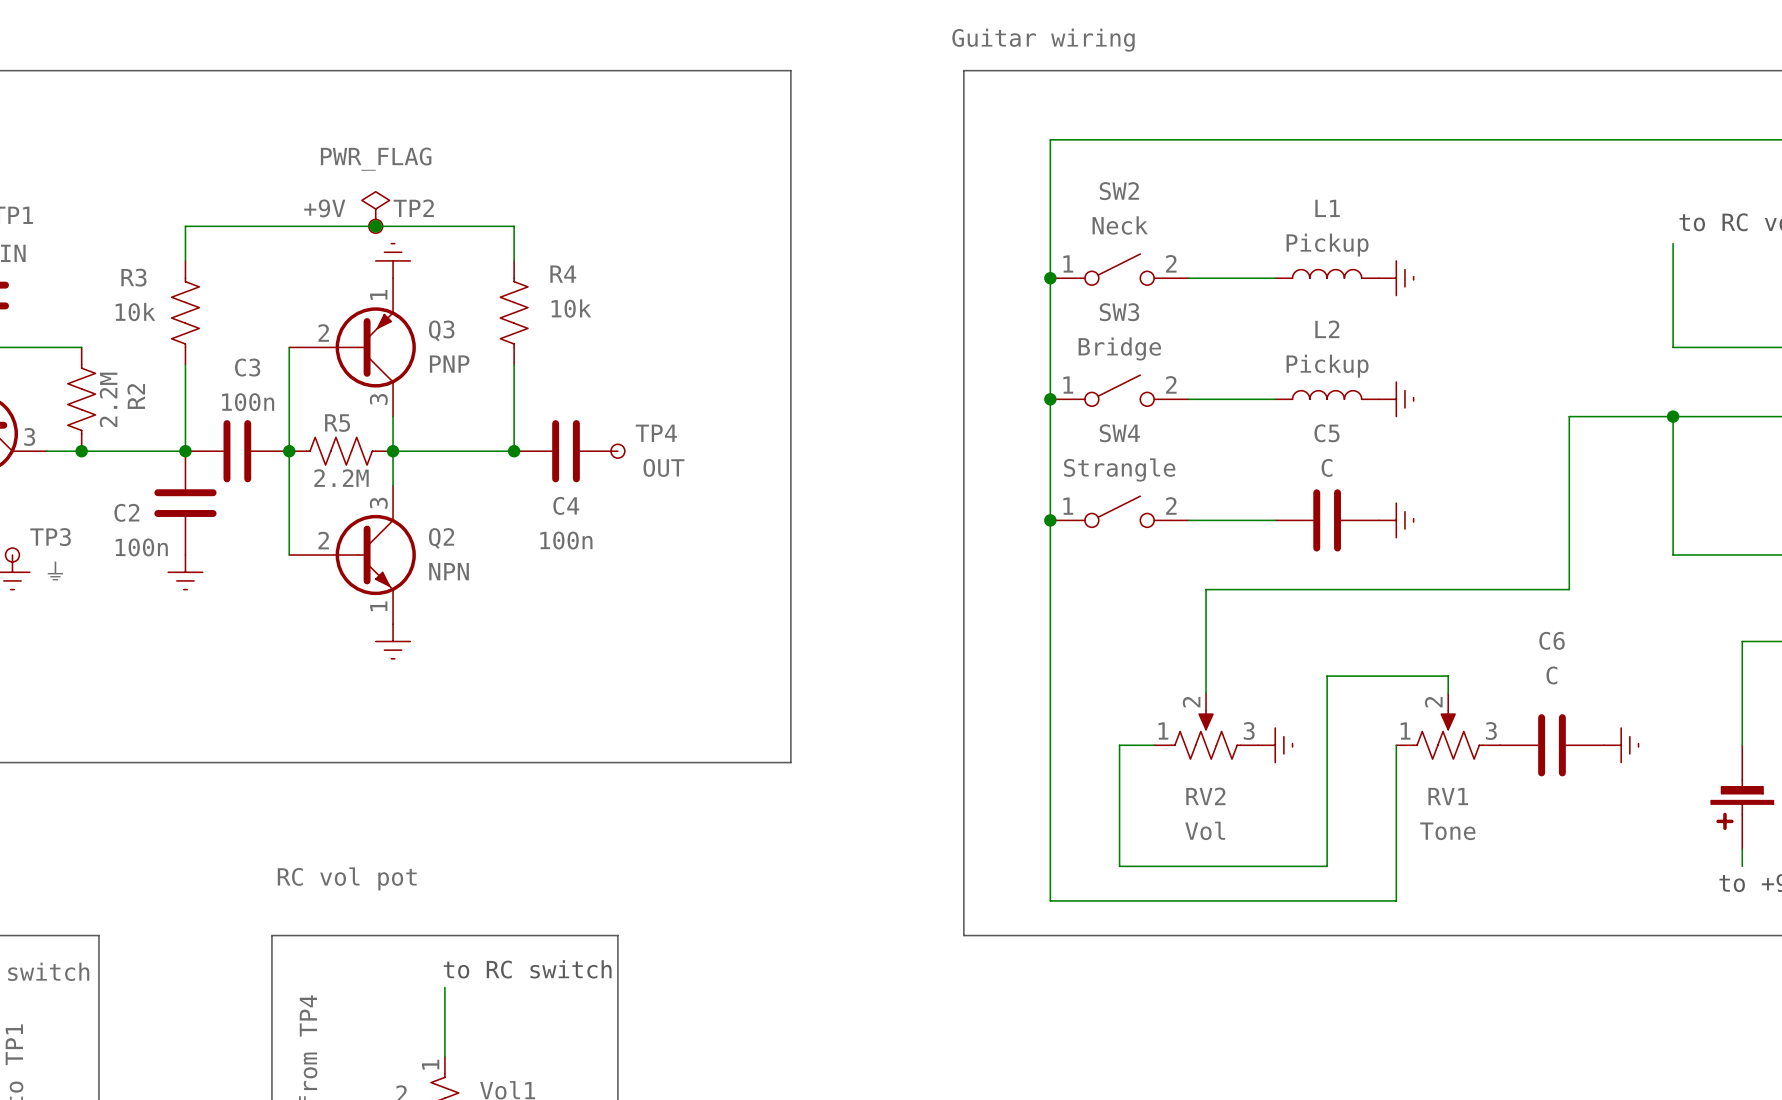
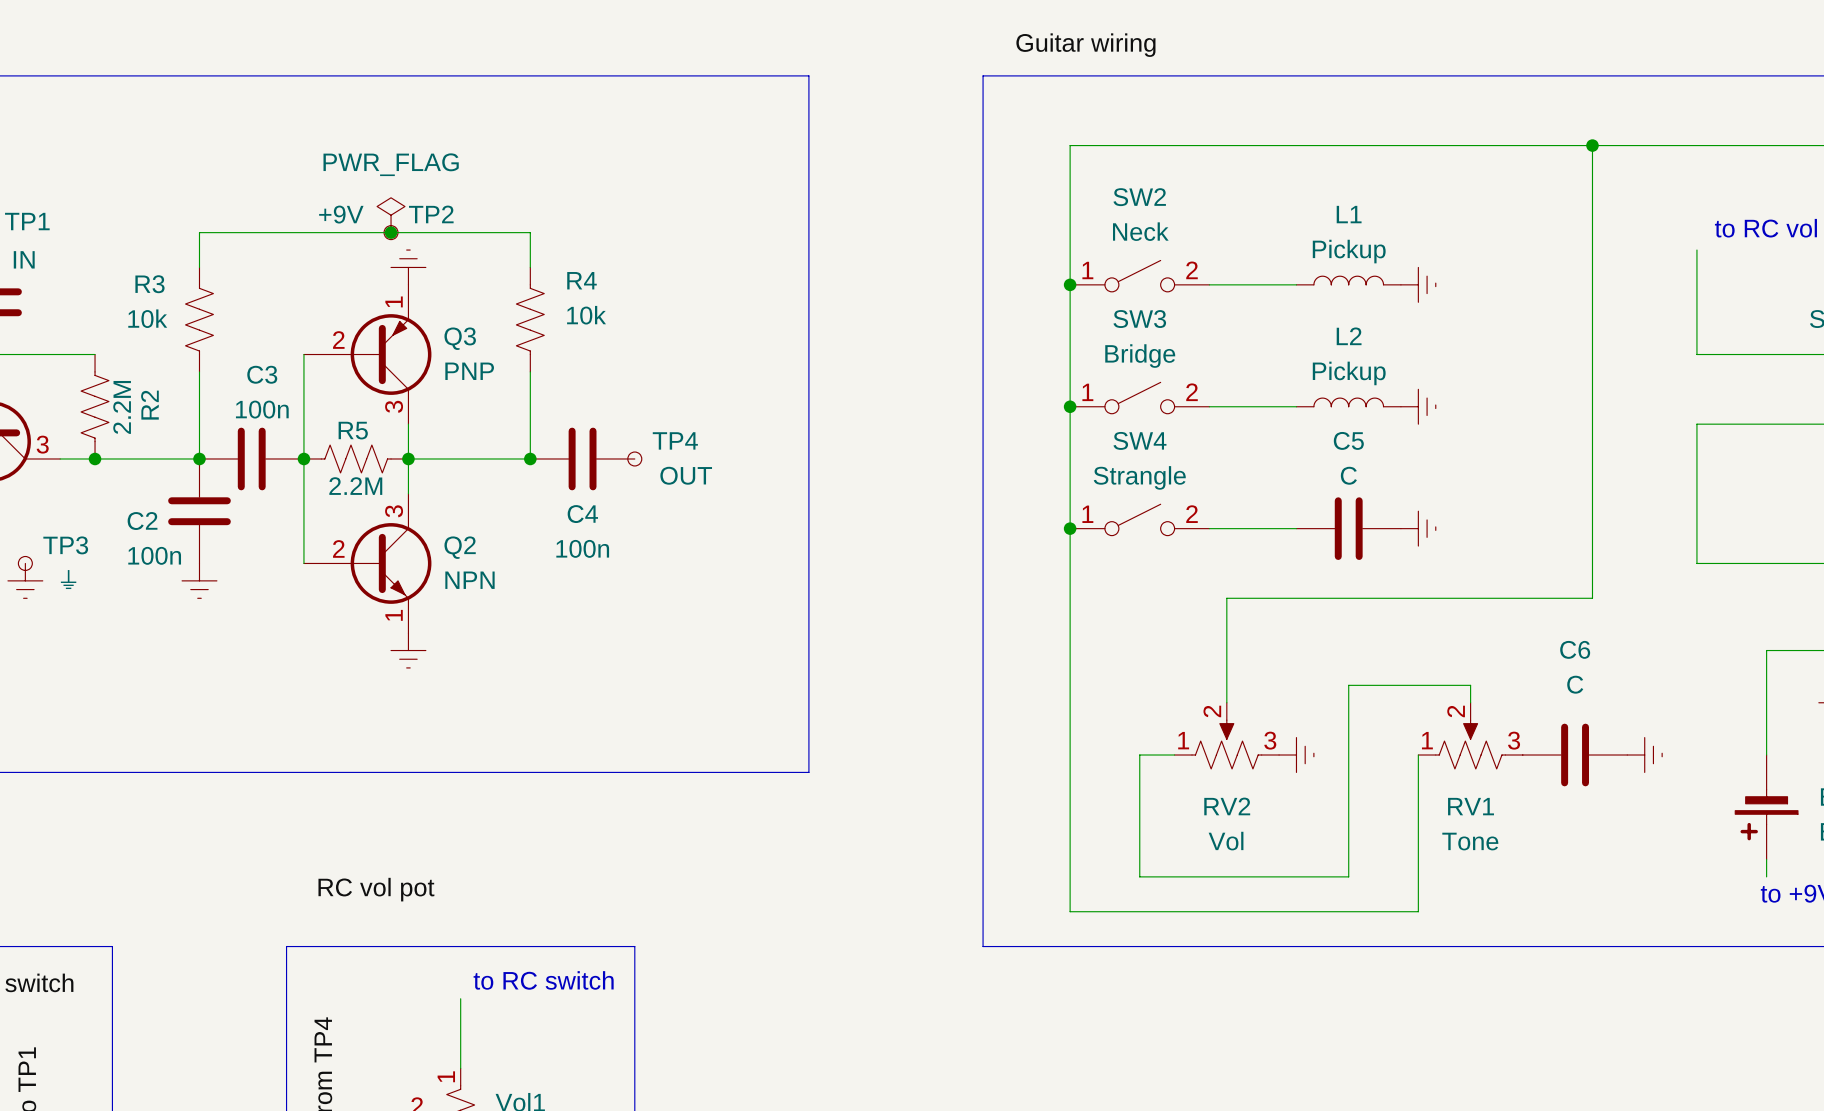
junction: none -> (1592, 145)
wire: (1569, 416) (1673, 416) -> (1592, 424) (1592, 145)
junction: (1673, 416) -> none

